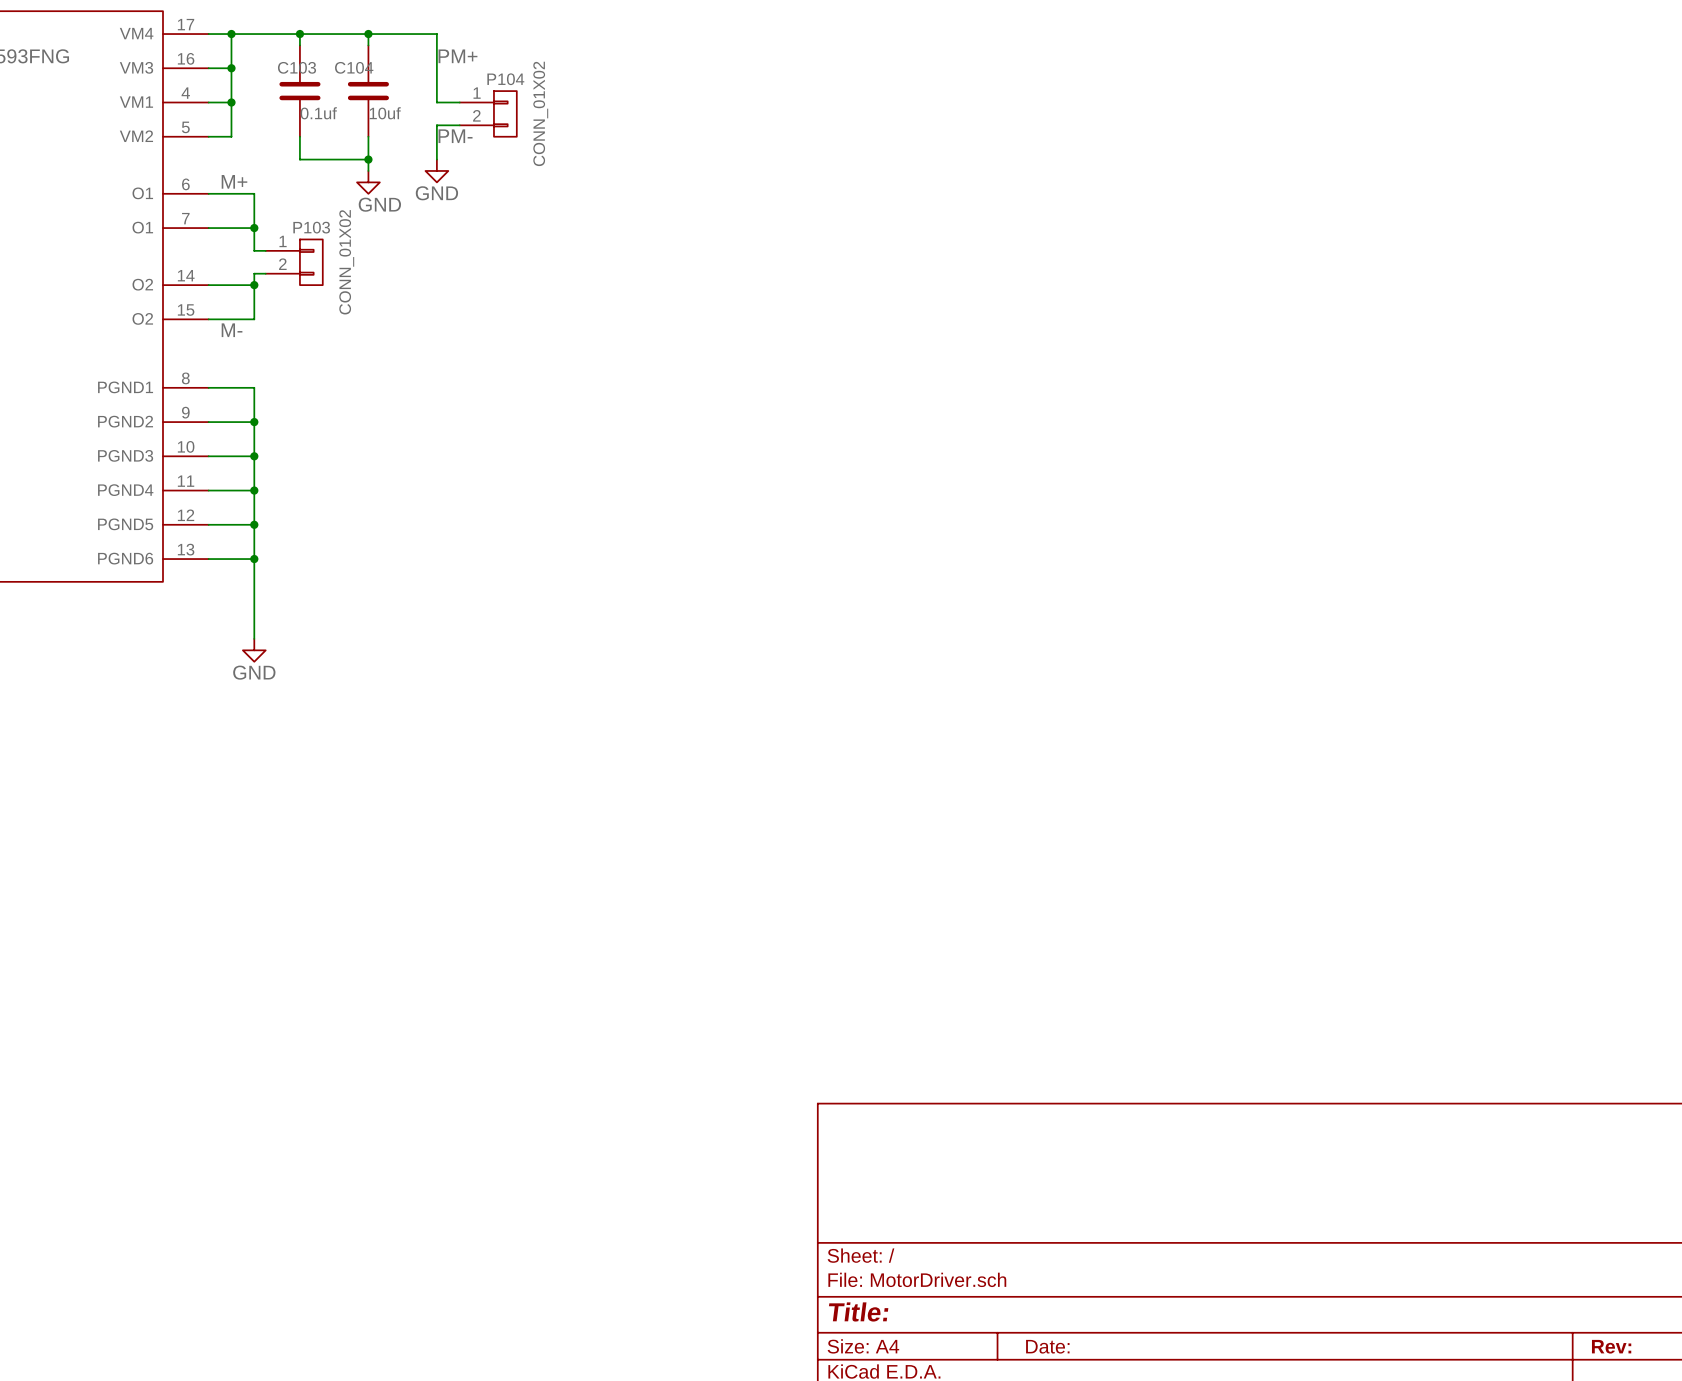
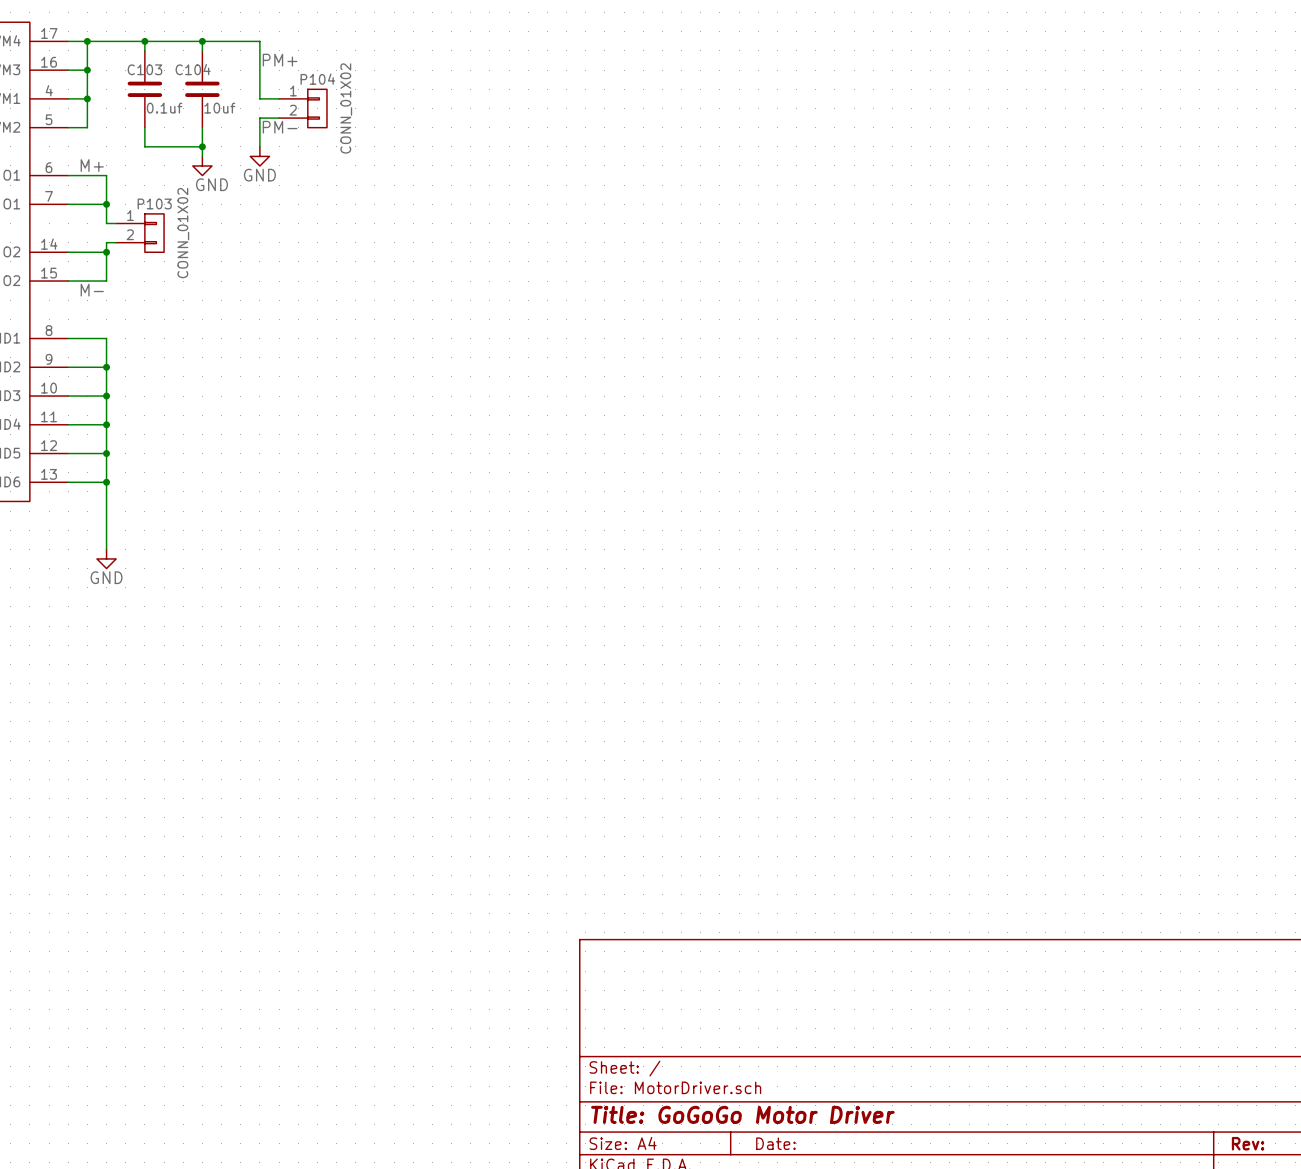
title block: Title: (858, 1311) -> Title: GoGoGo Motor Driver (742, 1114)

